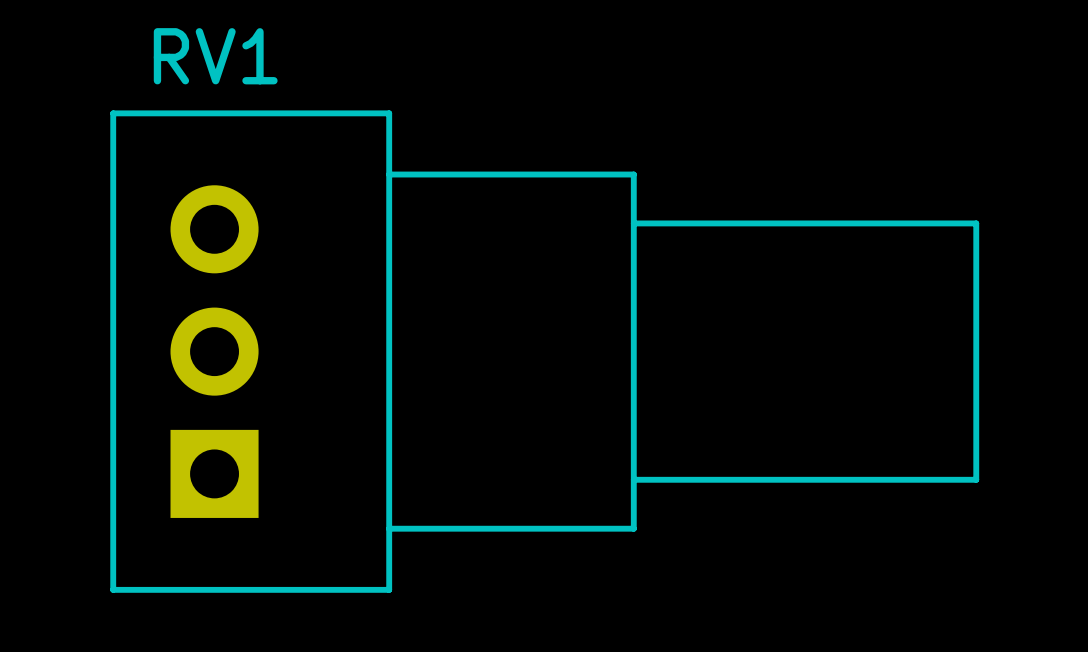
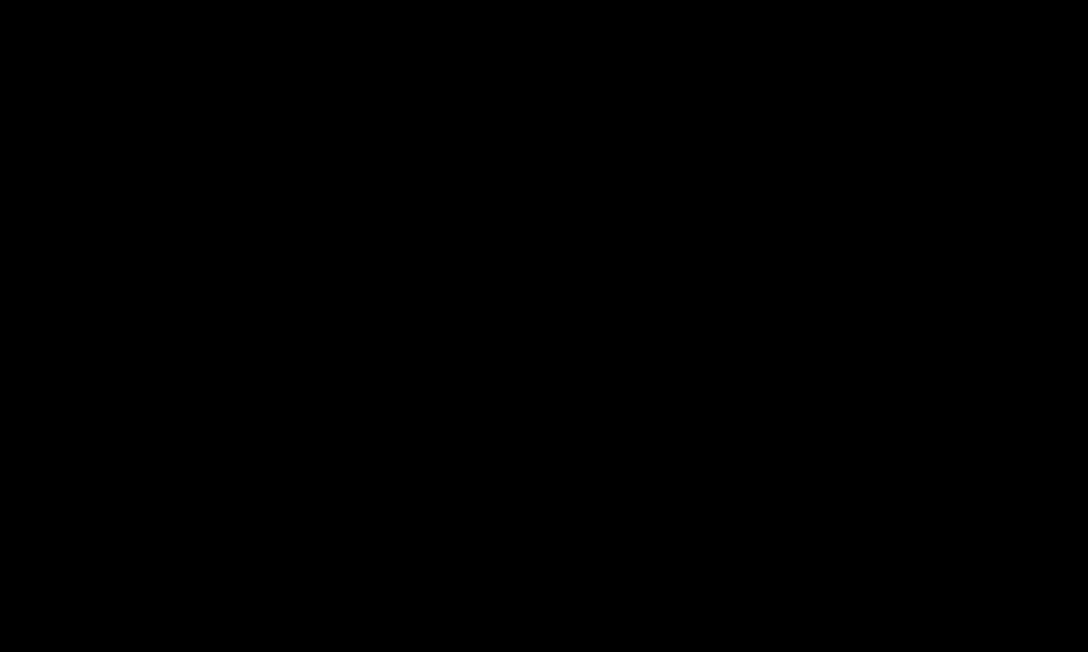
RV1: (544, 351) -> none

